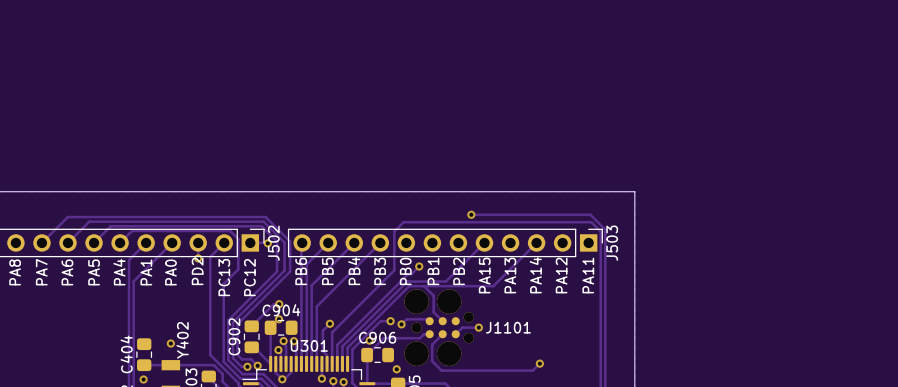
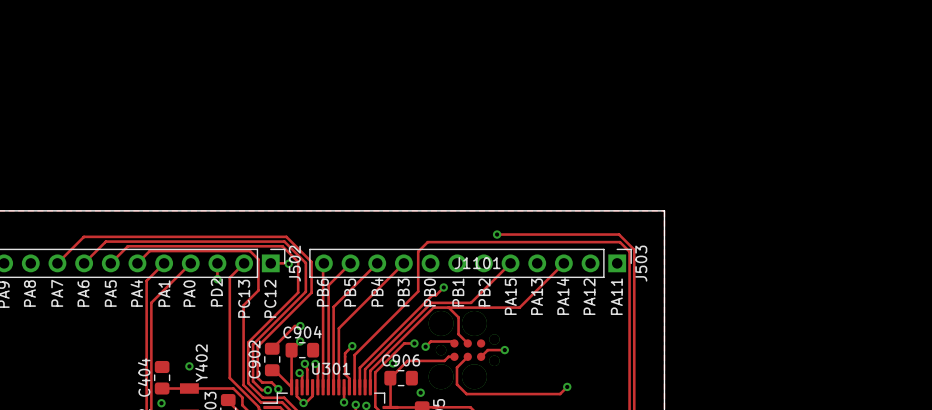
J1101 name position: J1101 (508, 327) -> J1101 (477, 263)

